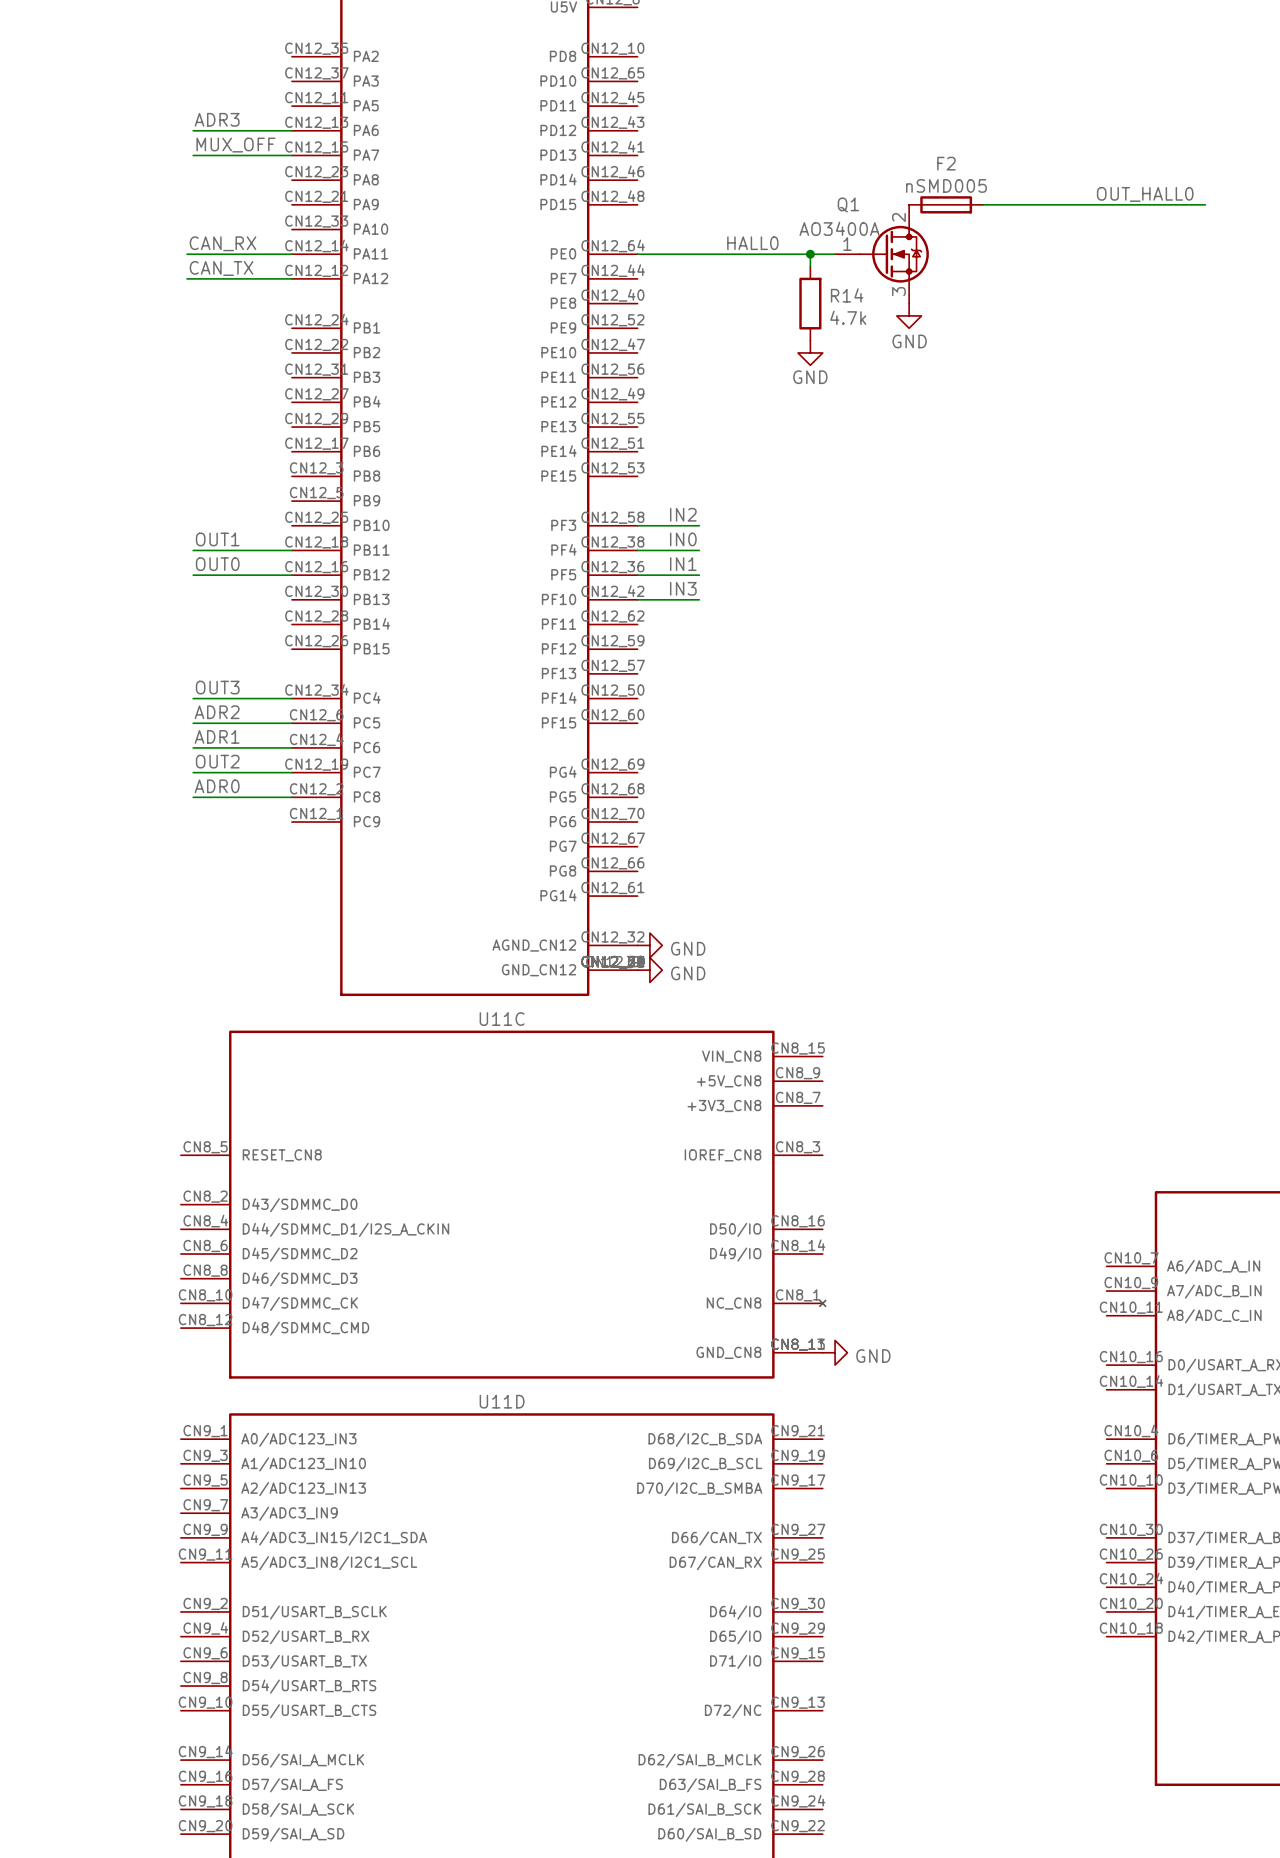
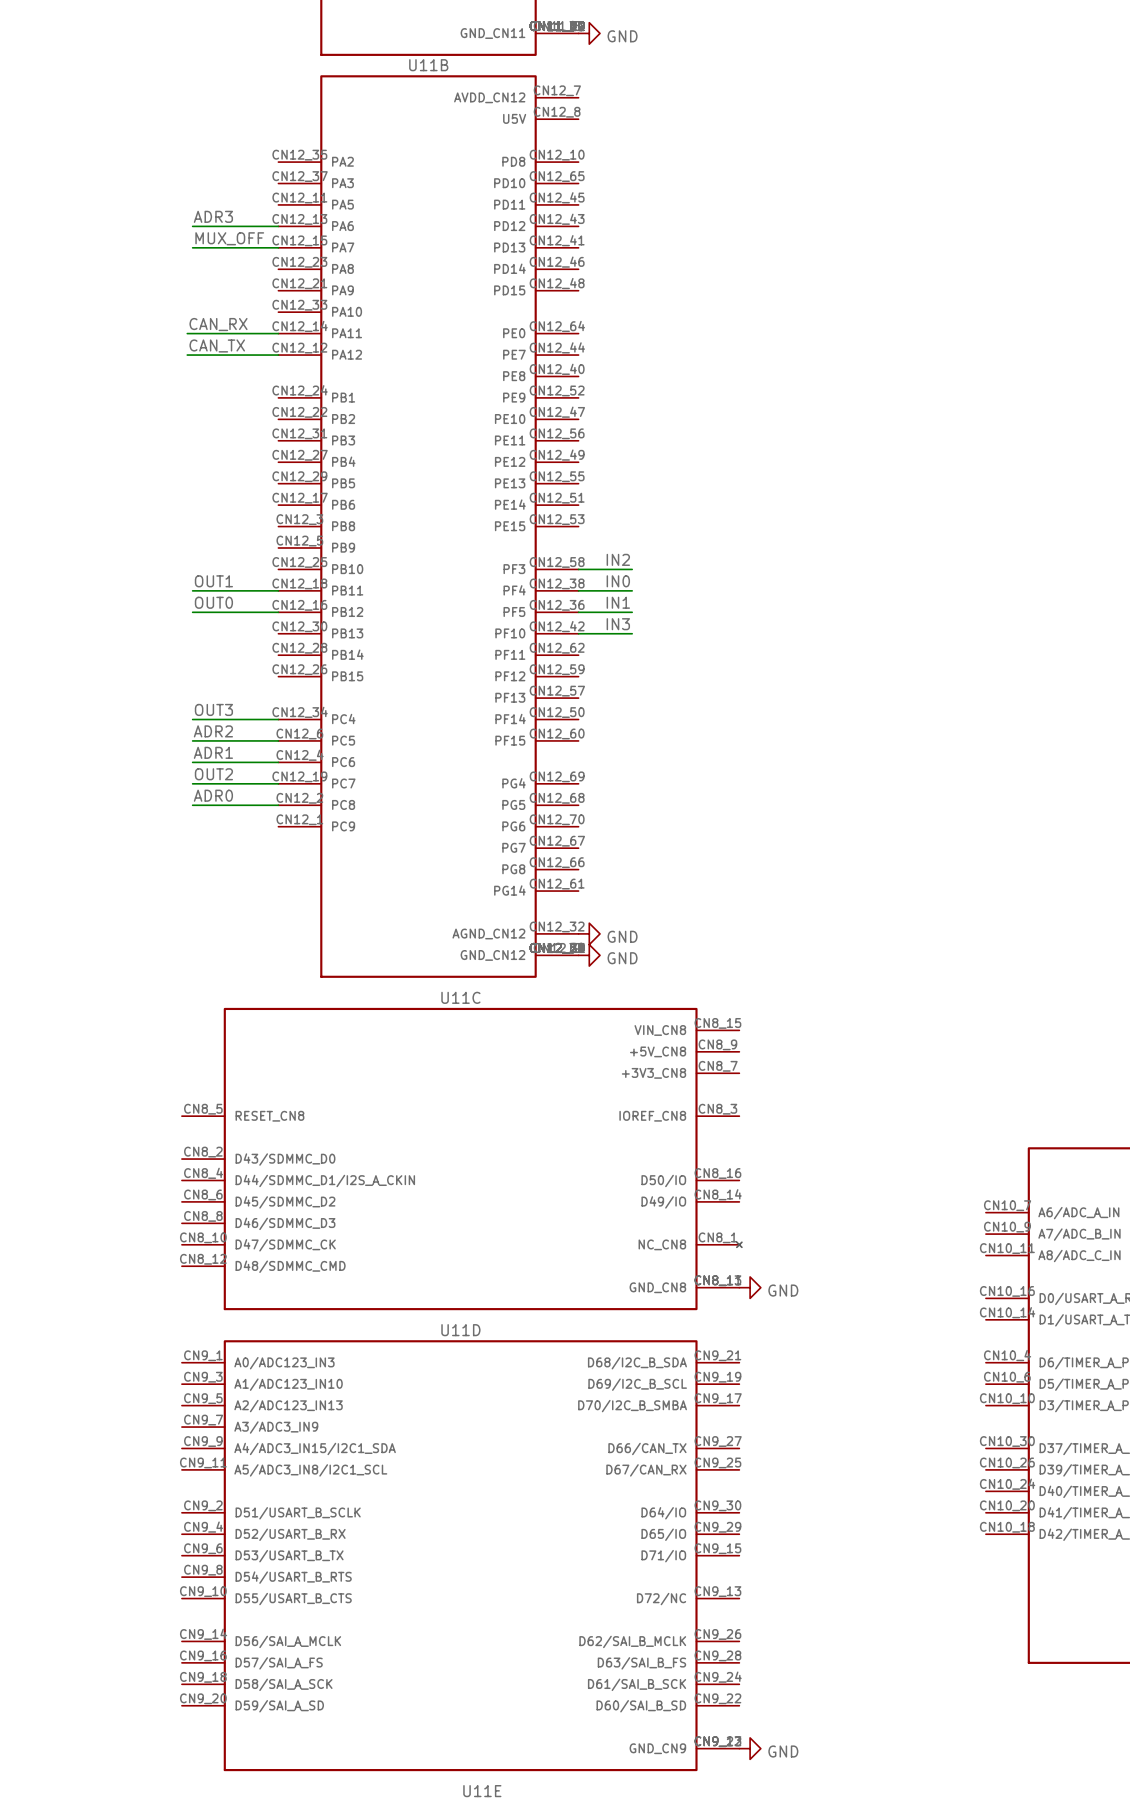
label: OUT_HALL0 (1145, 194) -> none
F2: nSMD005 (946, 204) -> none
wire: (983, 204) (1205, 204) -> none
label: HALL0 (752, 243) -> none
wire: (637, 254) (835, 254) -> none
wire: (810, 254) (810, 266) -> none
junction: (810, 254) -> none
Q1: AO3400A (881, 254) -> none
R14: 4.7k (810, 303) -> none
power symbol: GND (909, 315) -> none
power symbol: GND (810, 352) -> none

